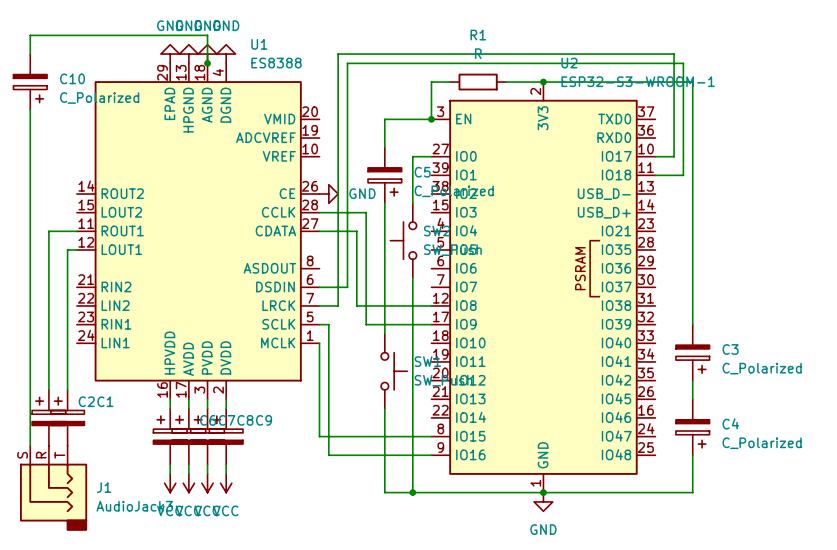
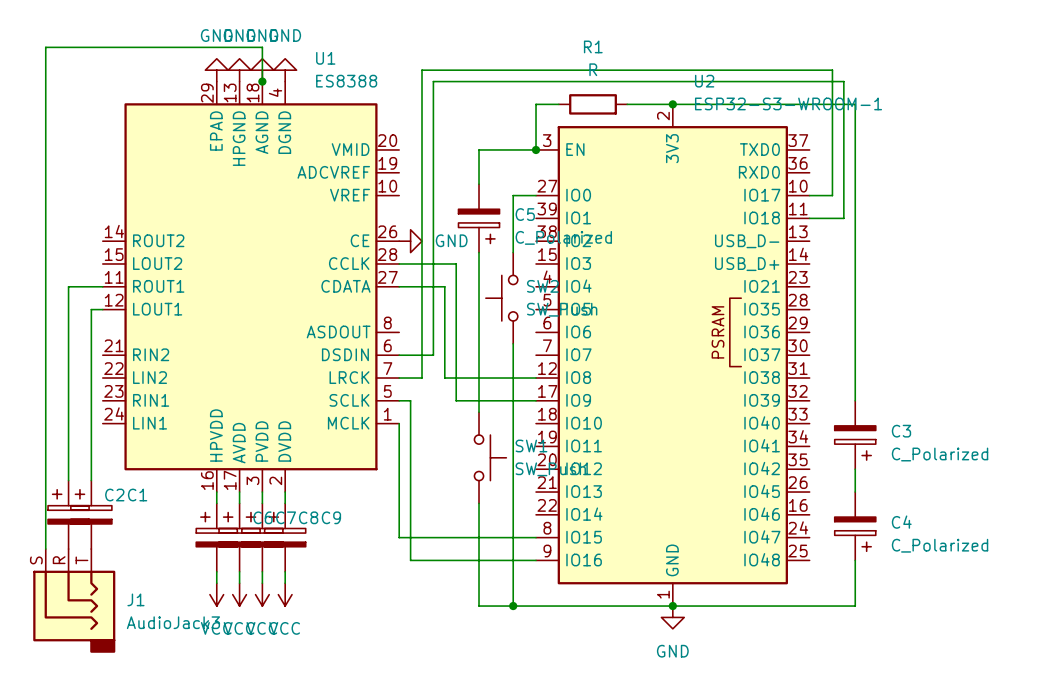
C10: C_Polarized (30, 82) -> none

